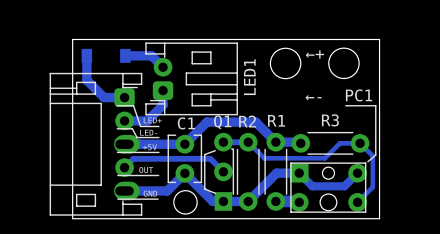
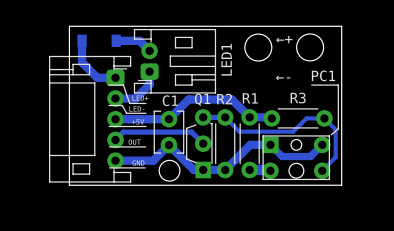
part footprint: [49, 72, 143, 216] -> [49, 55, 132, 183]

